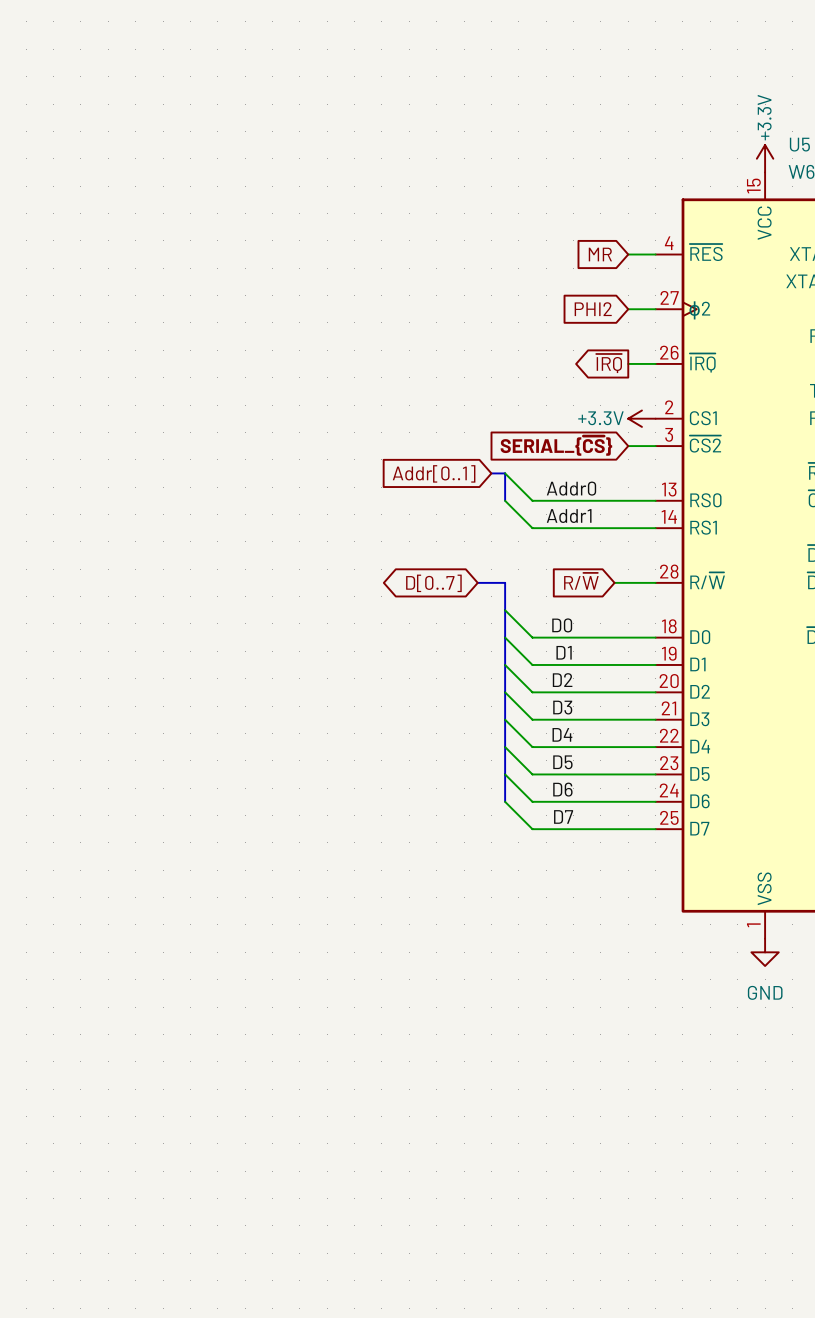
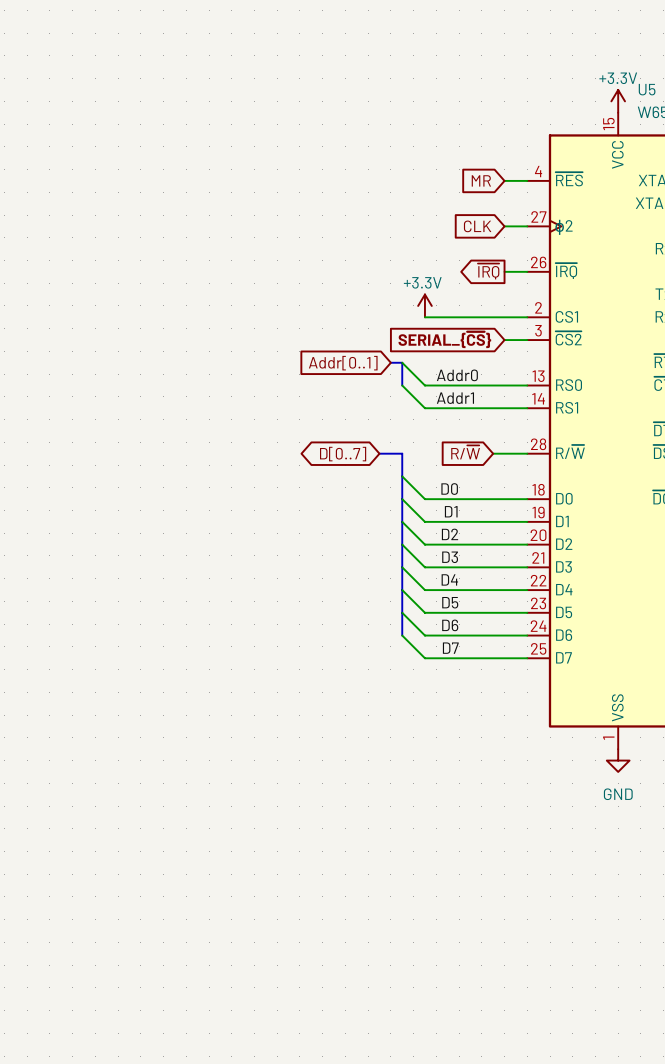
power symbol text rotation: 0° (764, 117) -> 90° clockwise (618, 78)
global label: PHI2 (593, 309) -> CLK (477, 226)
wire: none -> (424, 317) (527, 317)
power symbol rotation: 0° (641, 418) -> 90° clockwise (424, 305)
power symbol position: +3.3V (641, 418) -> +3.3V (424, 305)

